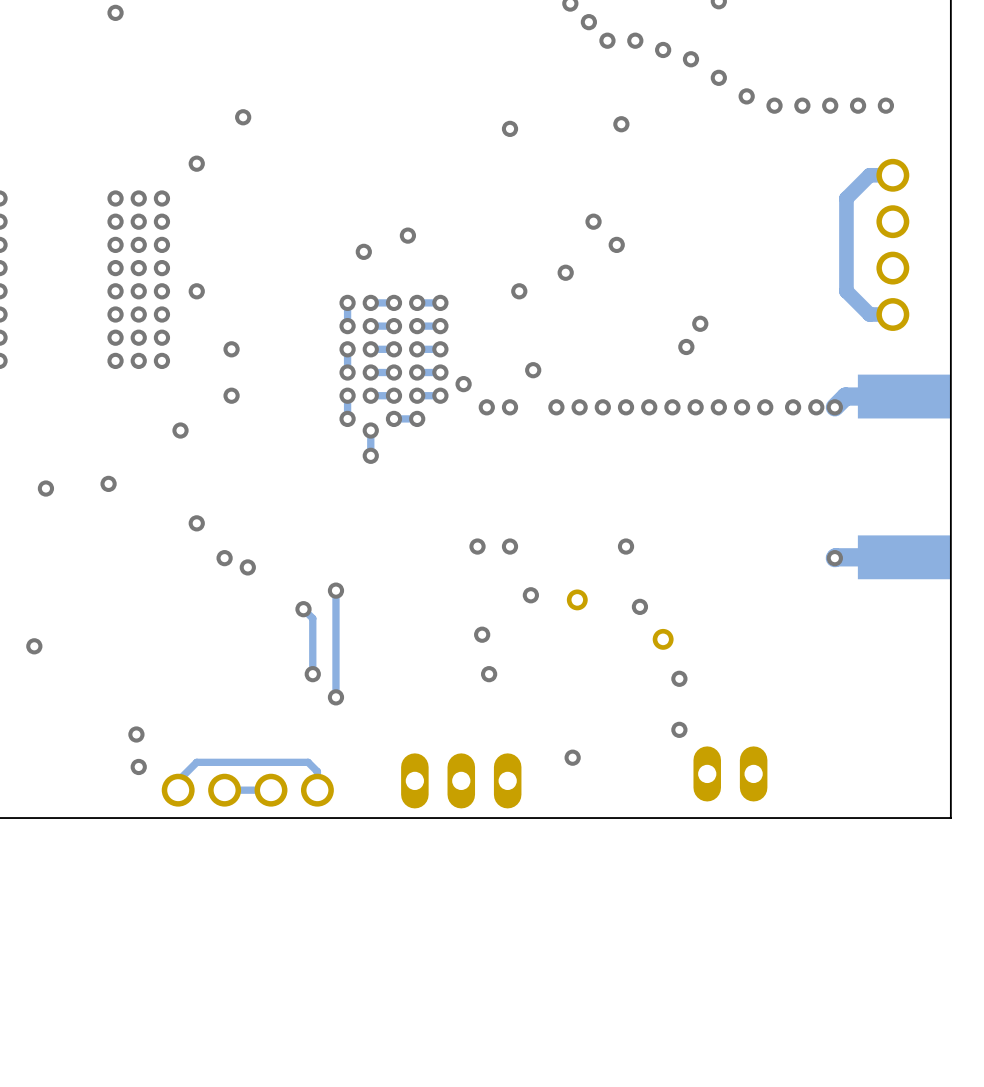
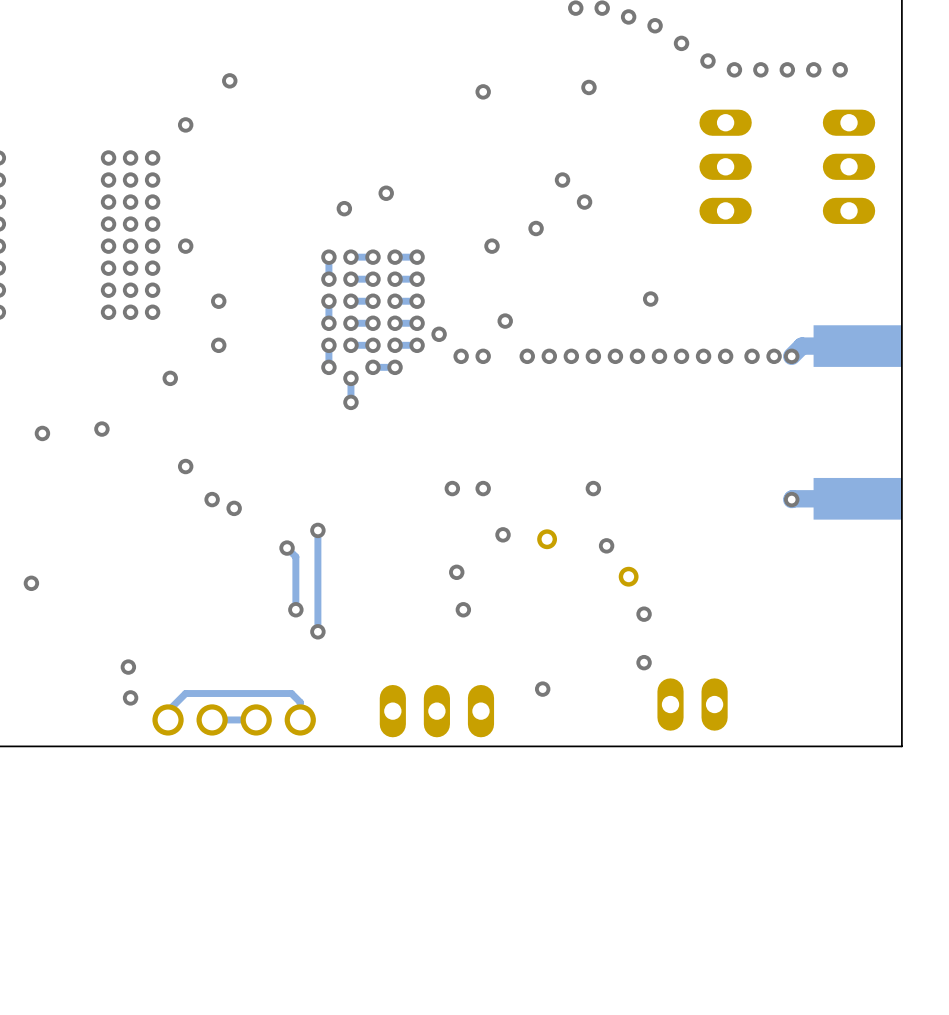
track: (892, 175) (869, 175) (846, 198) (846, 291) (869, 314) (892, 314) -> none
part: none -> (725, 166)
part: none -> (849, 166)
part: (892, 244) -> none
via: (700, 323) -> none

